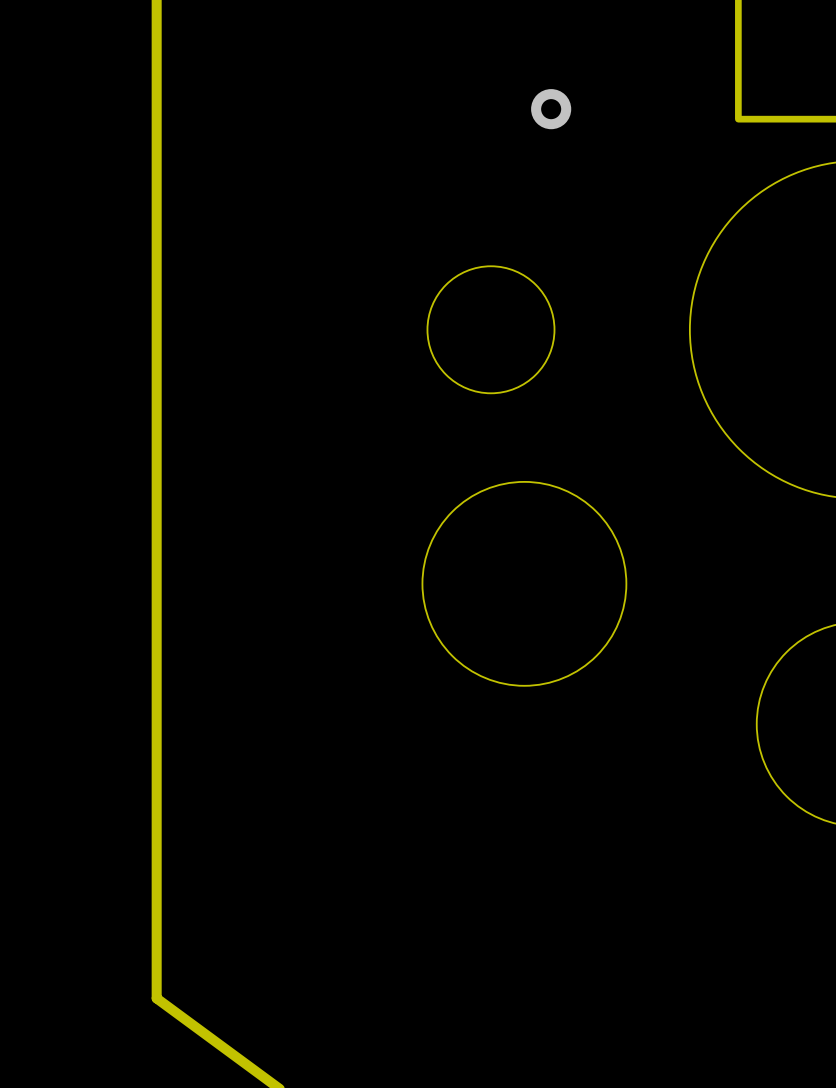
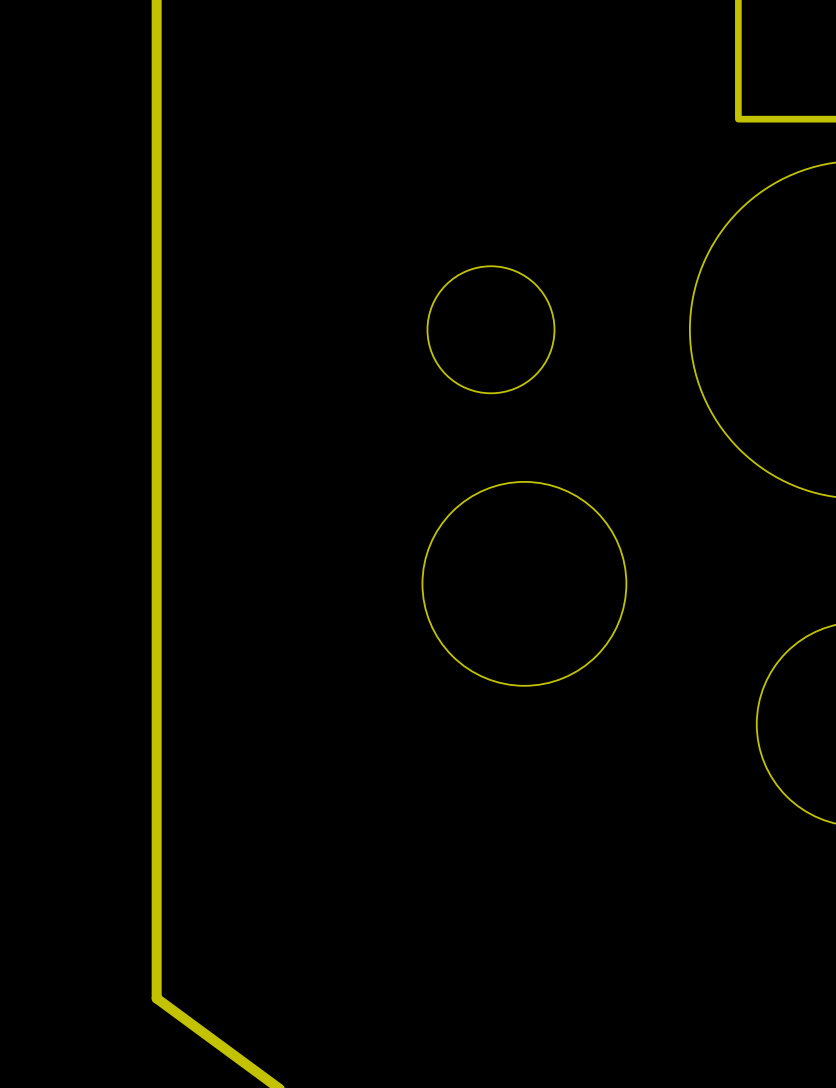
via: (551, 109) -> none

